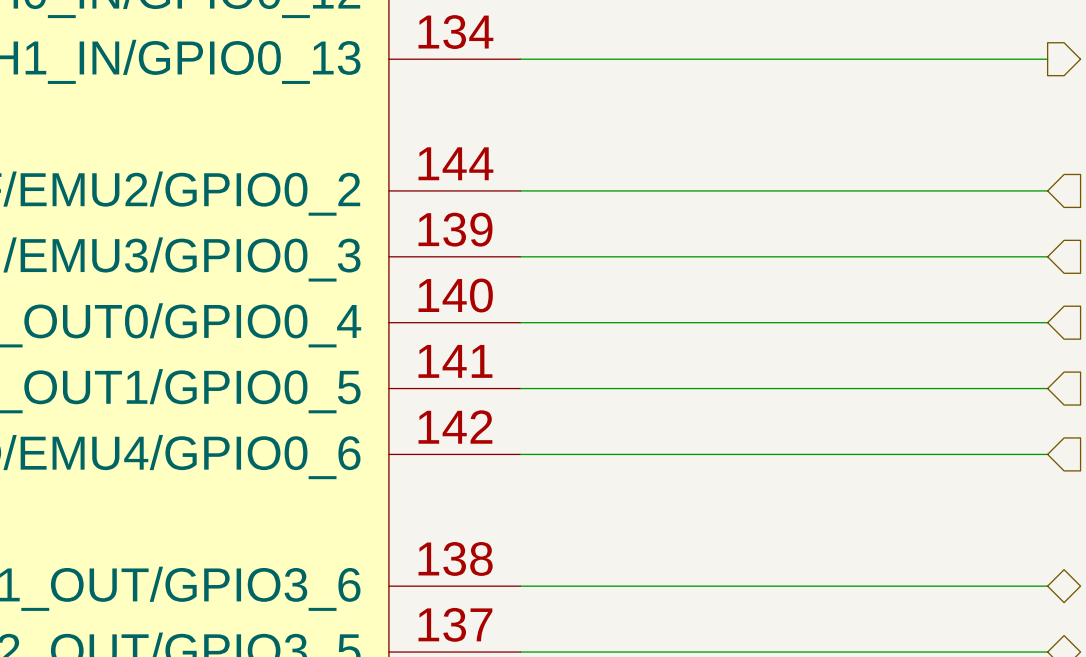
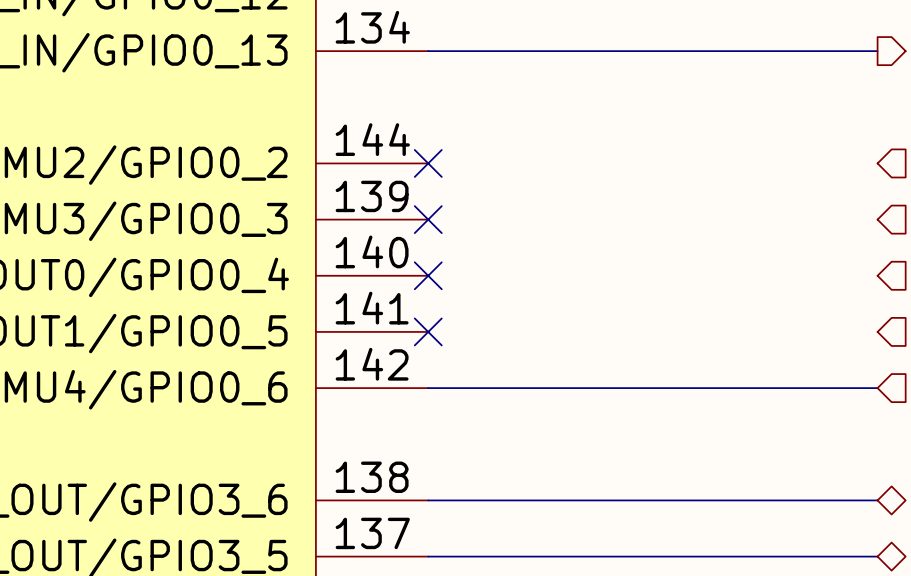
wire: (520, 190) (1047, 190) -> none
no-connect mark: none -> (428, 163)
wire: (520, 256) (1047, 256) -> none
no-connect mark: none -> (428, 219)
wire: (520, 322) (1047, 322) -> none
no-connect mark: none -> (428, 275)
wire: (520, 388) (1047, 388) -> none
no-connect mark: none -> (428, 331)

